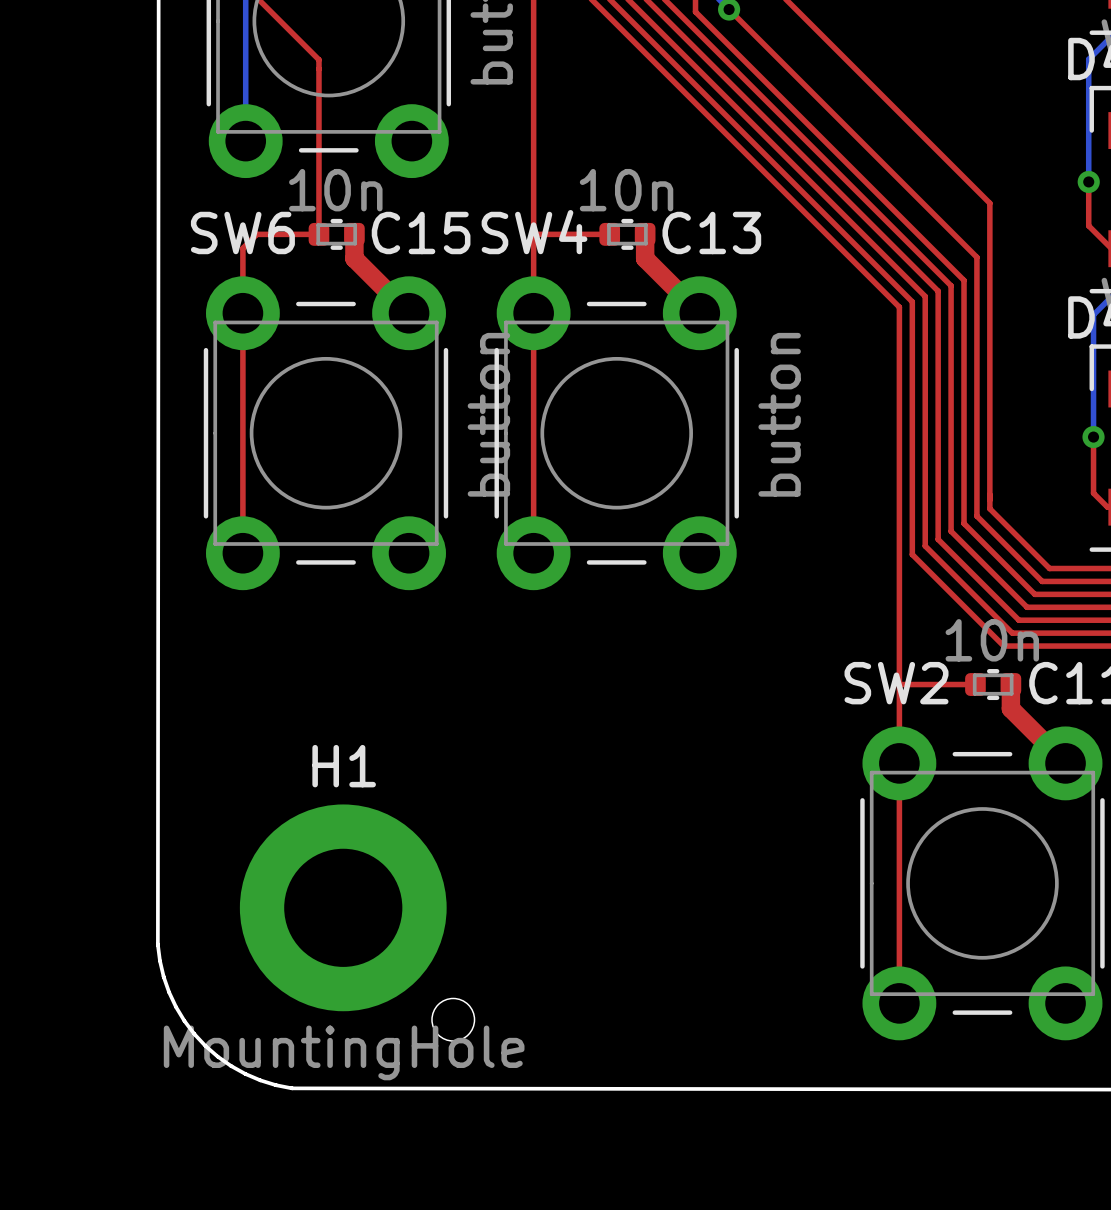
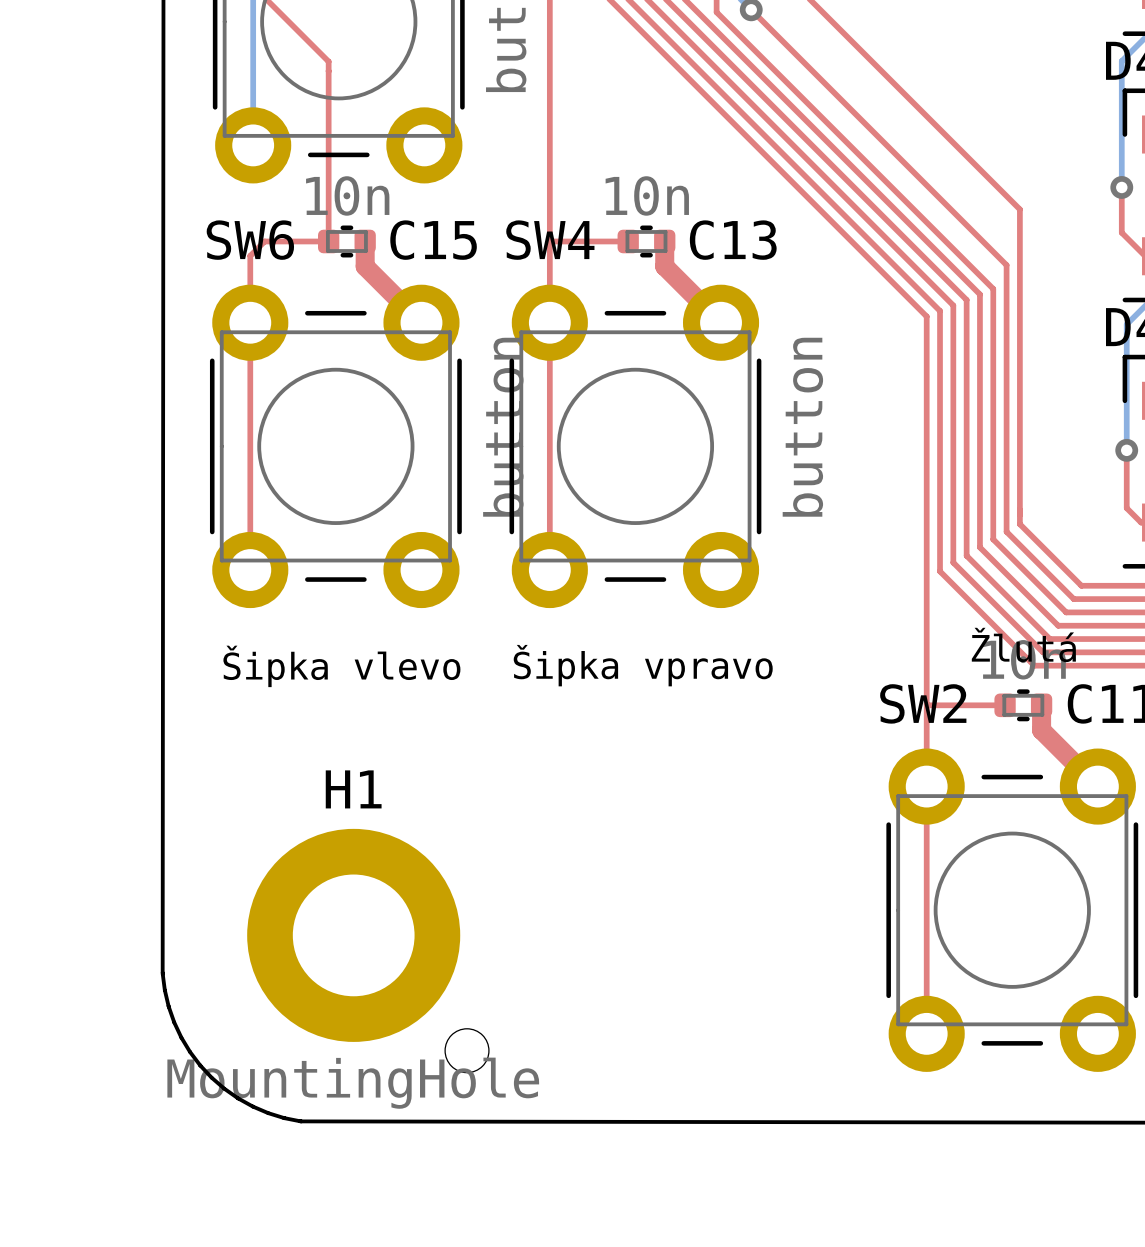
text: none -> Žlutá (1023, 644)
text: none -> Šipka vlevo (341, 666)
text: none -> Šipka vpravo (643, 665)

